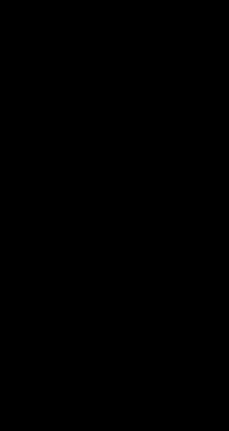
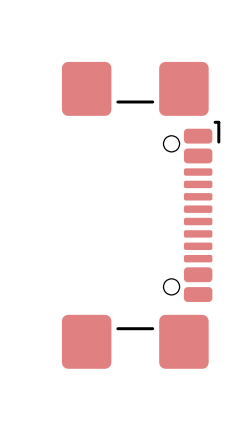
part: none -> (141, 215)

